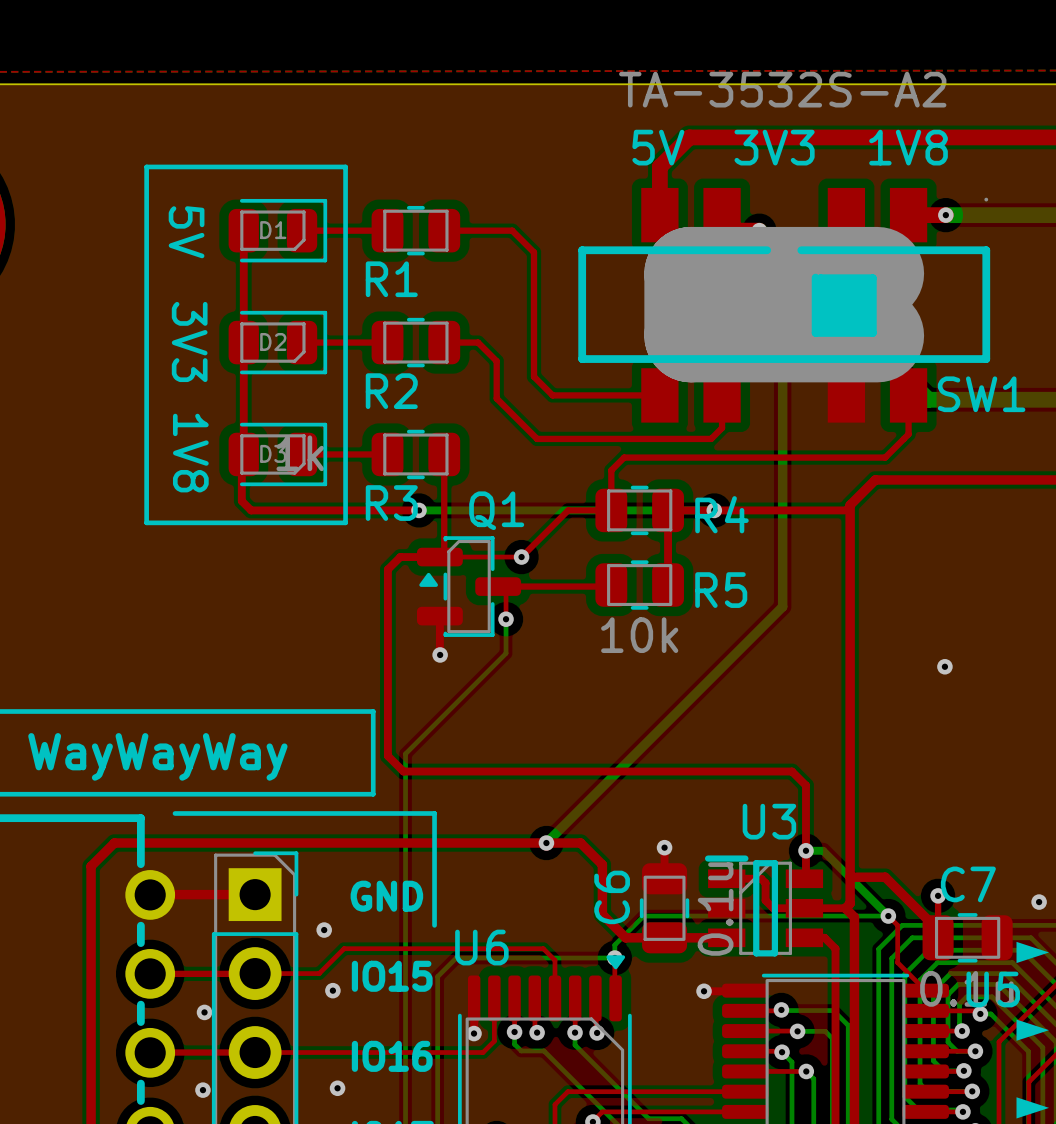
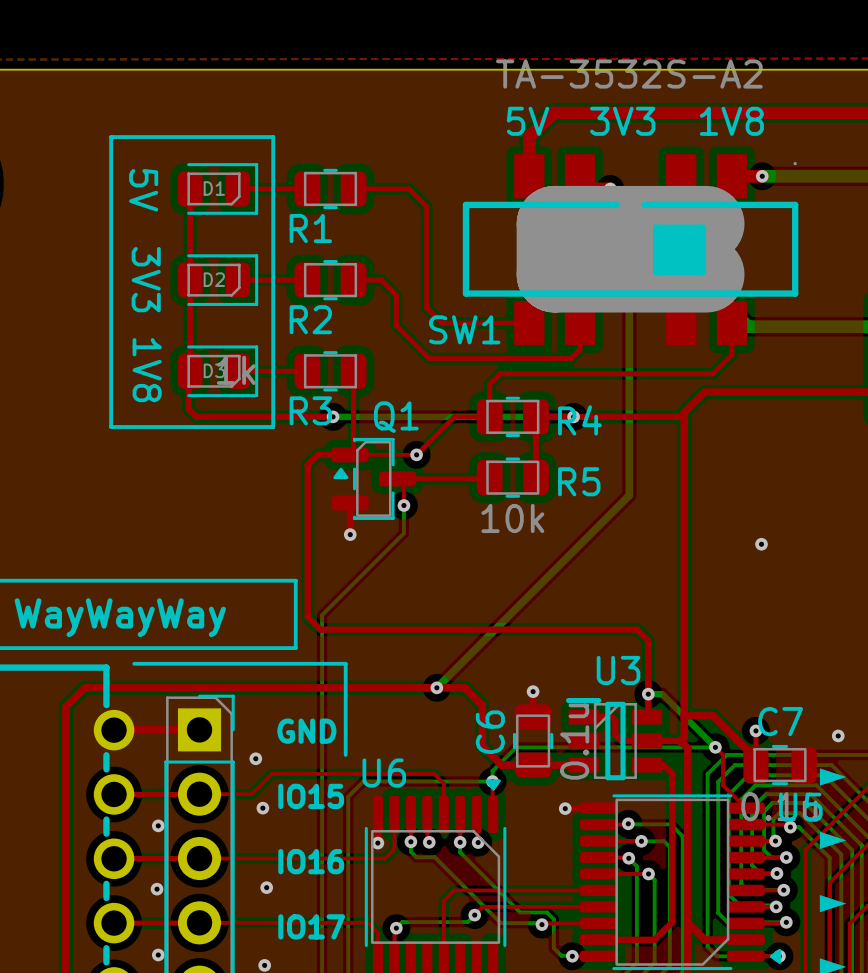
SW1 name position: SW1 (981, 394) -> SW1 (464, 329)

